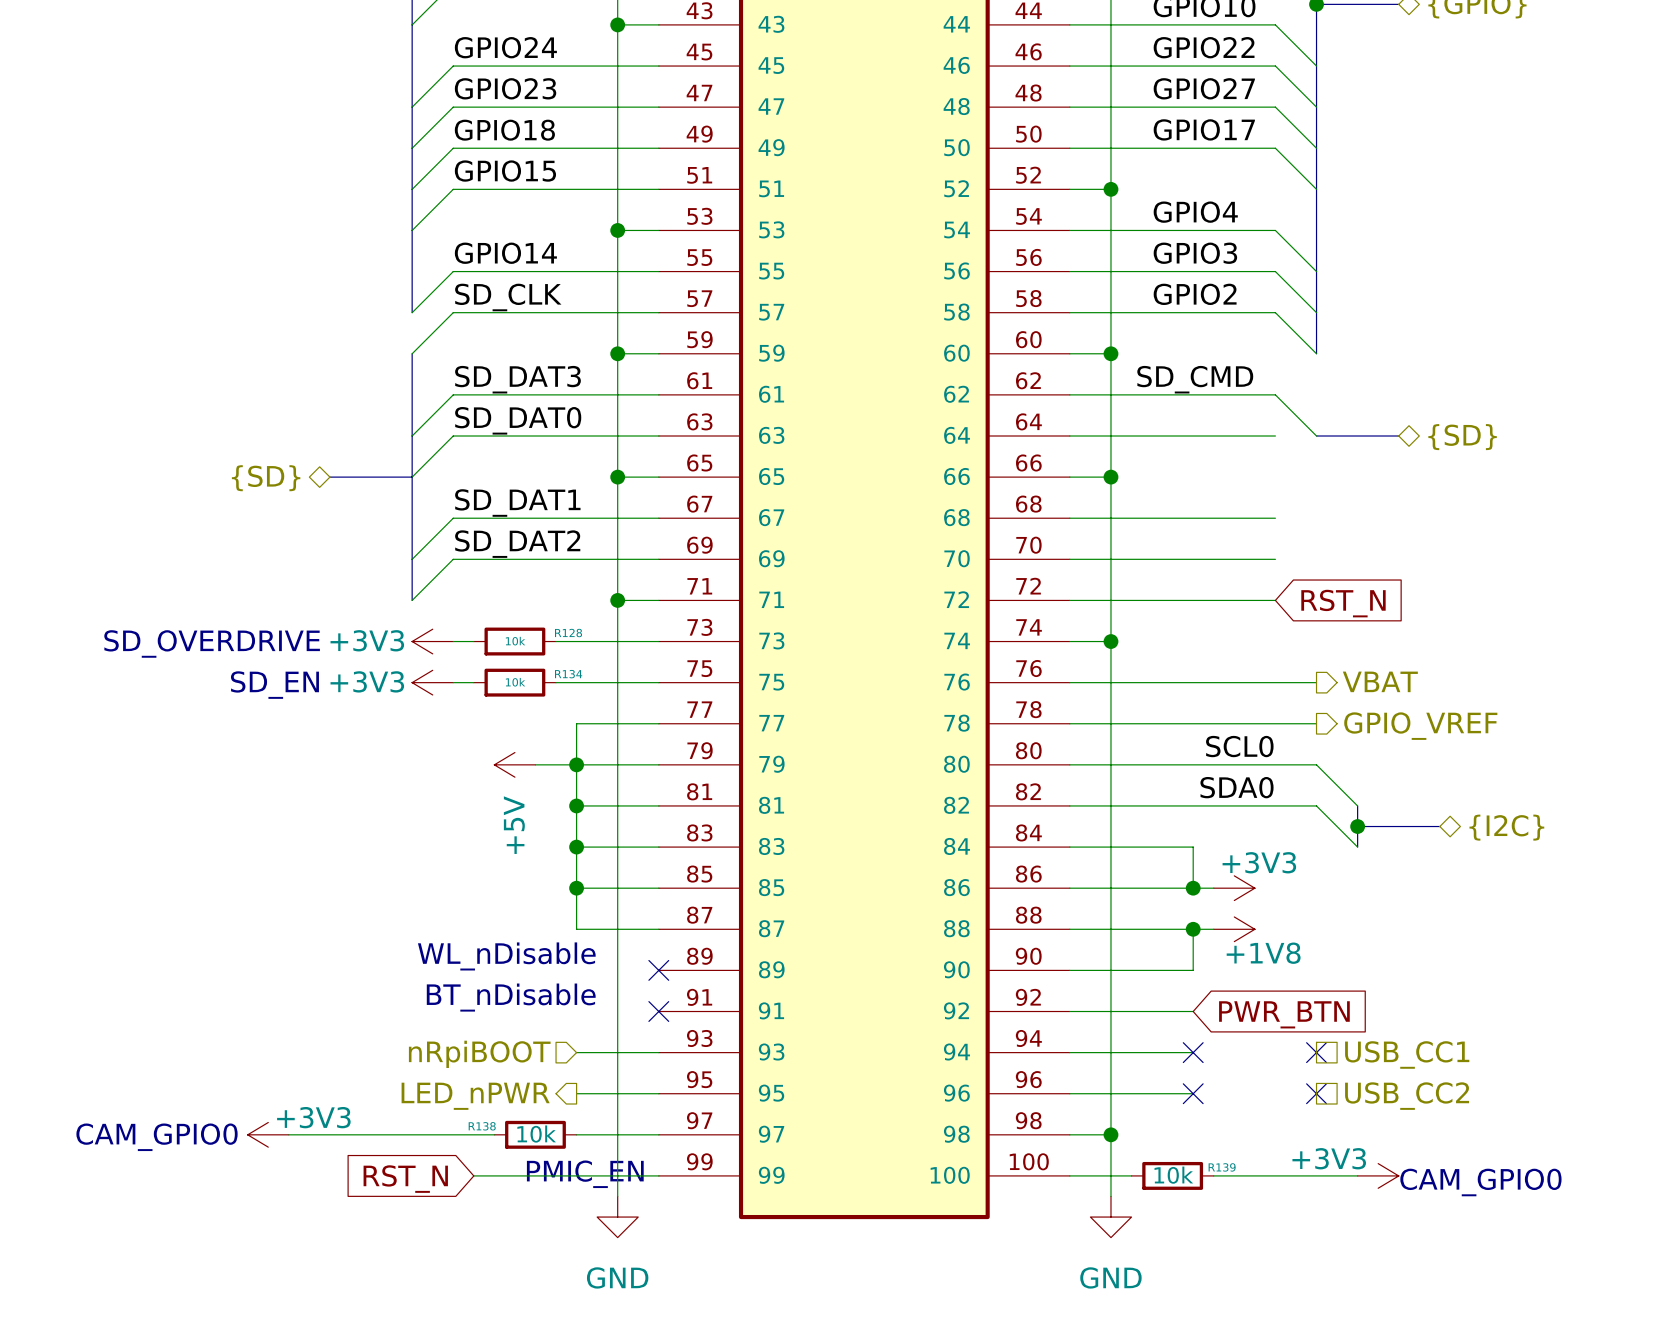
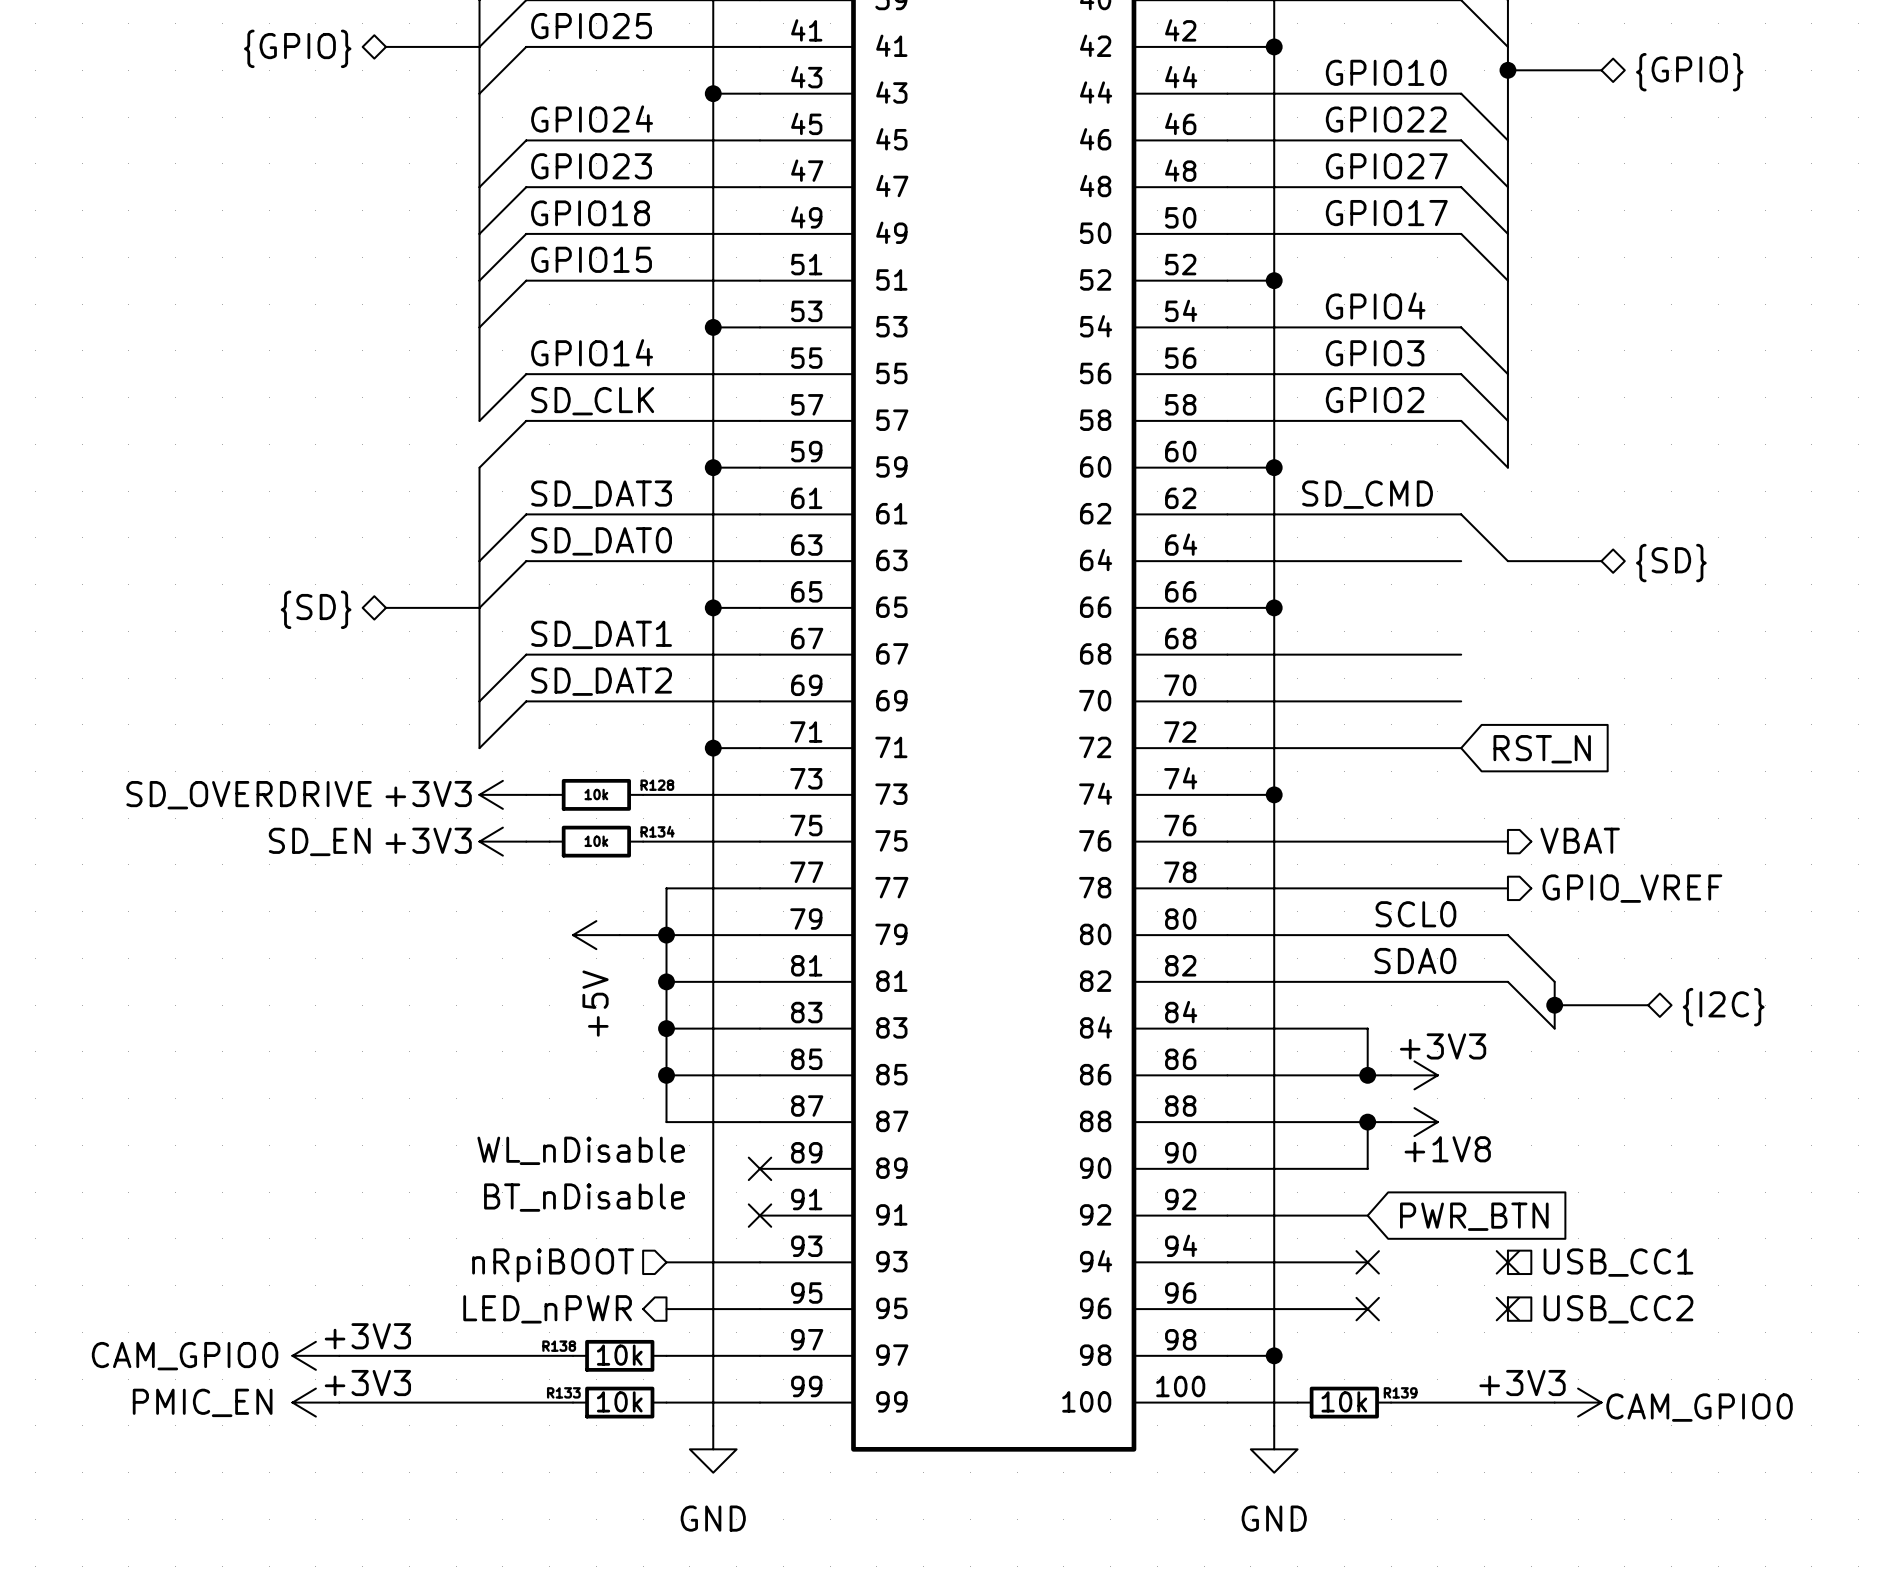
text: PMIC_EN (585, 1174) -> none
power symbol: none -> +3V3 (315, 1402)
wire: none -> (339, 1402) (549, 1402)
wire: (494, 1175) (576, 1175) -> none
R133: none -> 10k (619, 1402)
text: none -> PMIC_EN (202, 1402)
global label: RST_N (405, 1179) -> none

